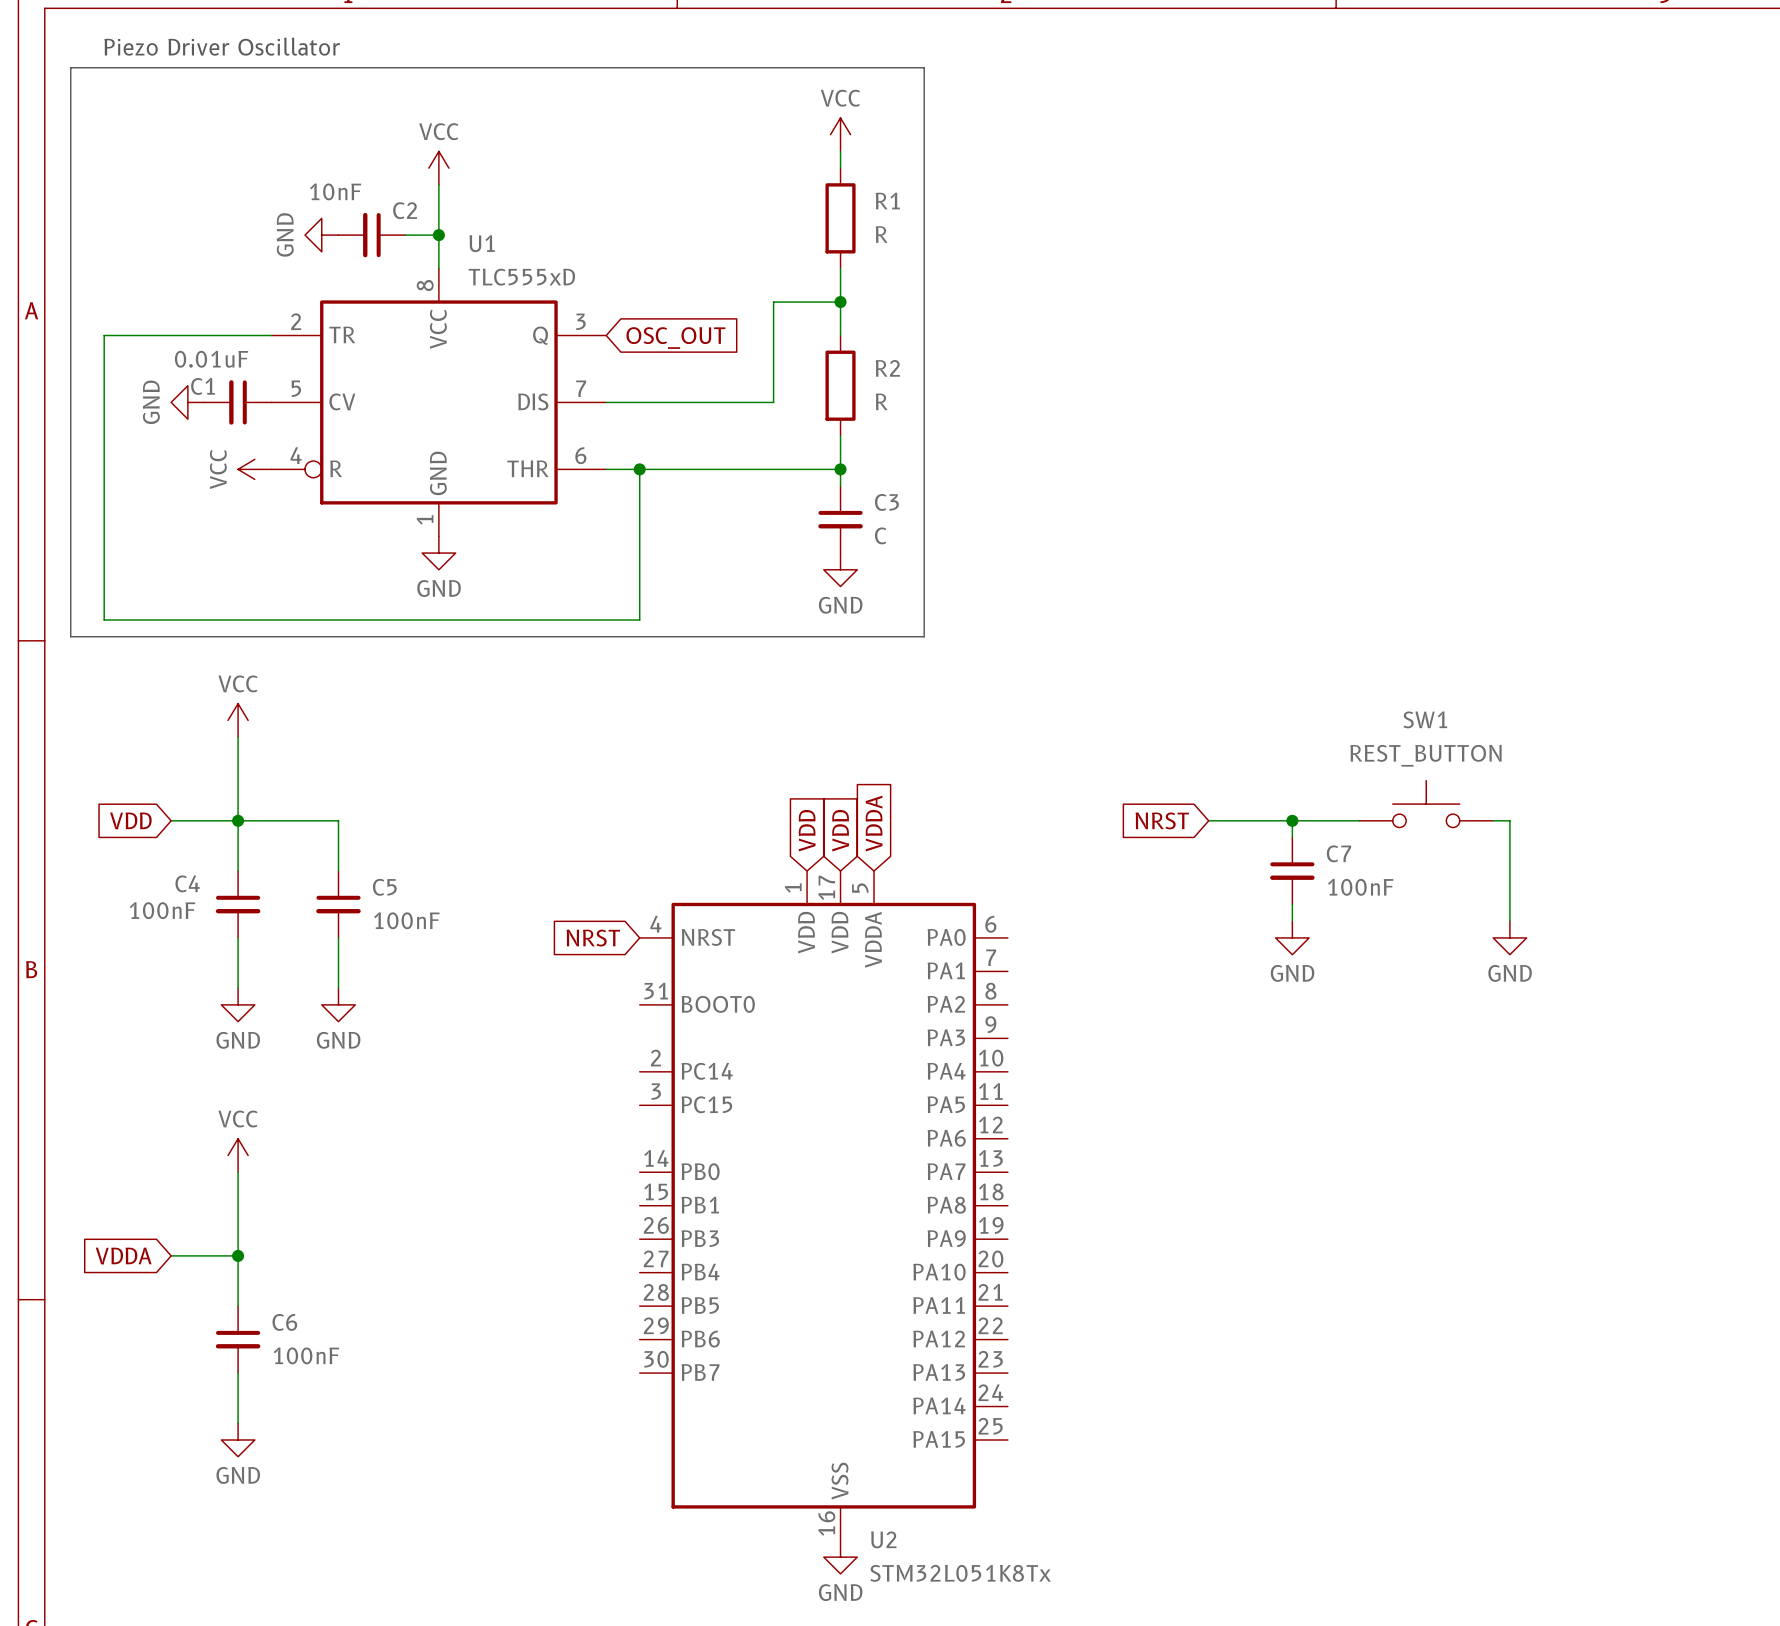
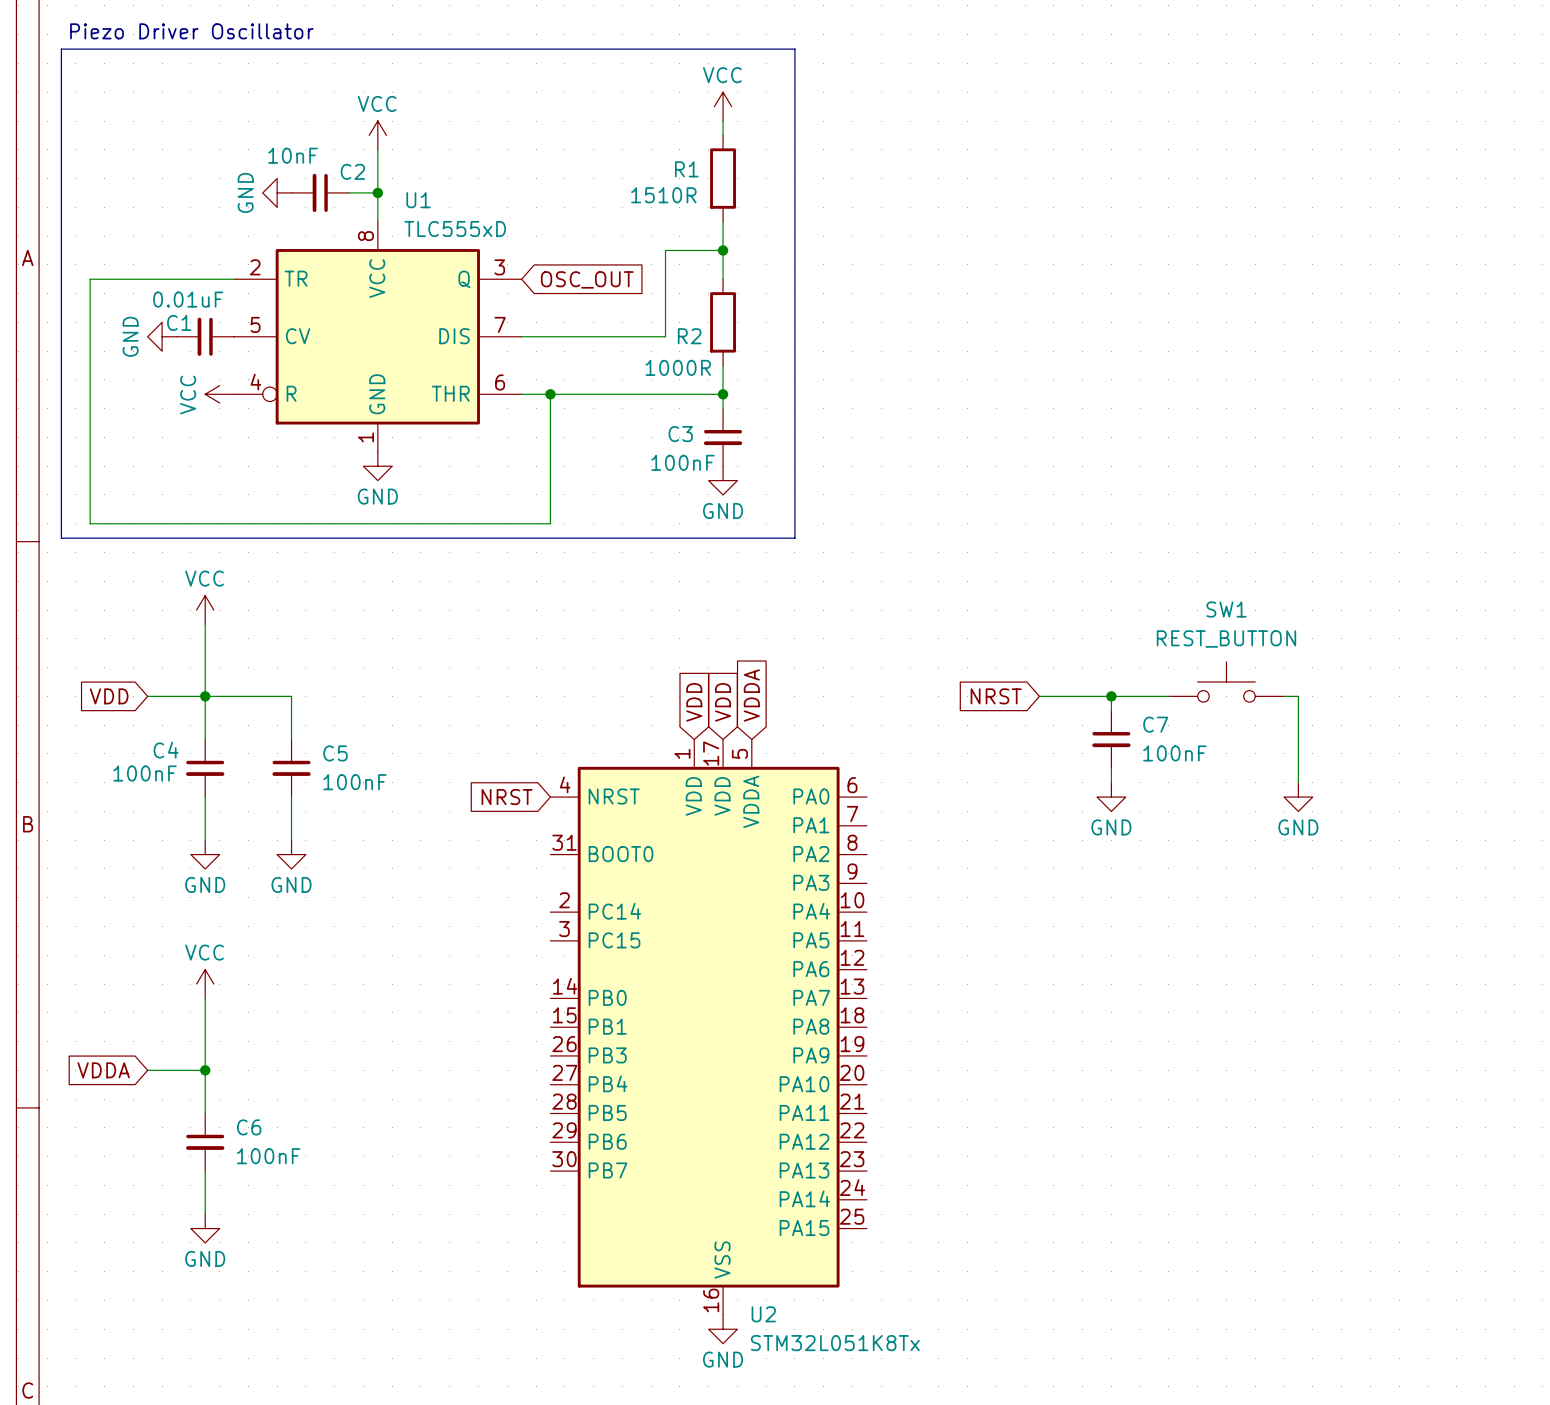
R1 name position: R1 (887, 201) -> R1 (686, 169)
R1 value: R (881, 234) -> 1510R (663, 195)
R2 name position: R2 (887, 368) -> R2 (689, 336)
R2 value: R (881, 401) -> 1000R (678, 367)
C3 name position: C3 (886, 502) -> C3 (680, 434)
C3 value: C (880, 535) -> 100nF (682, 462)

